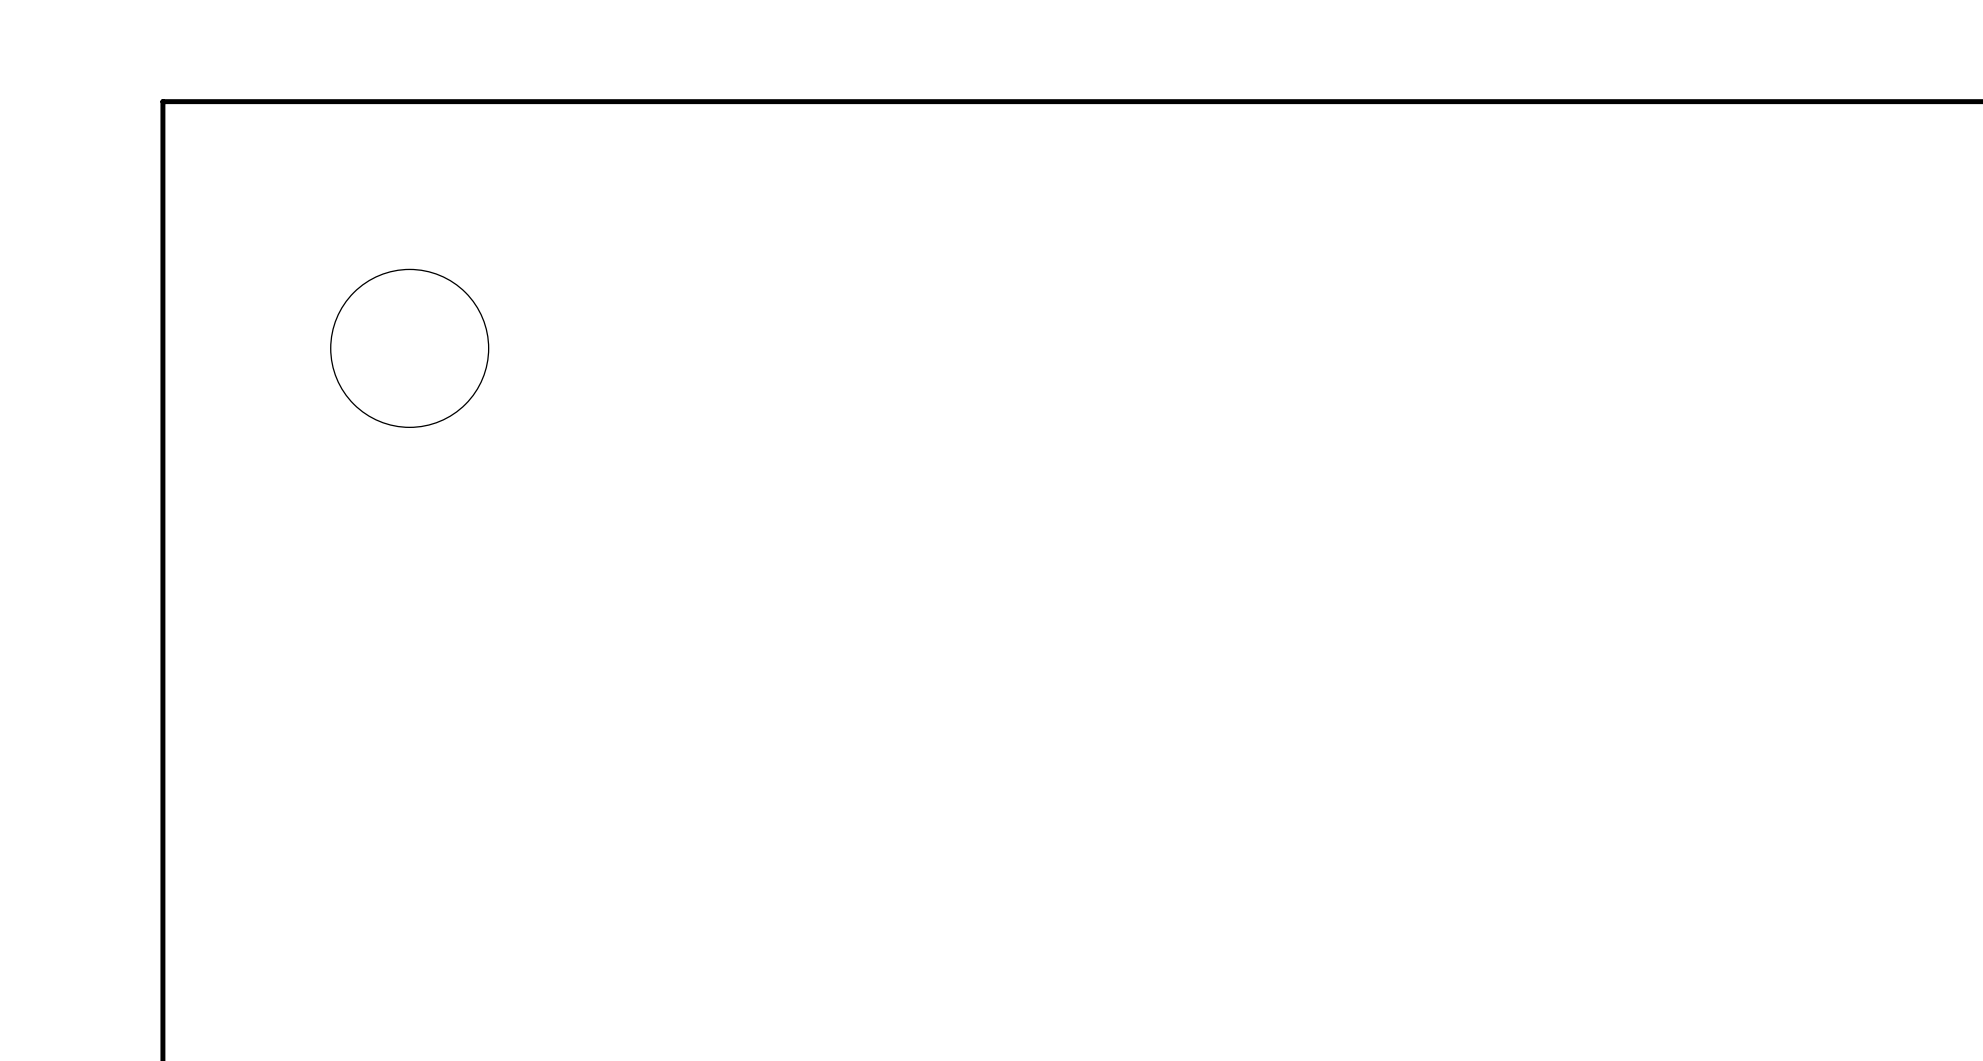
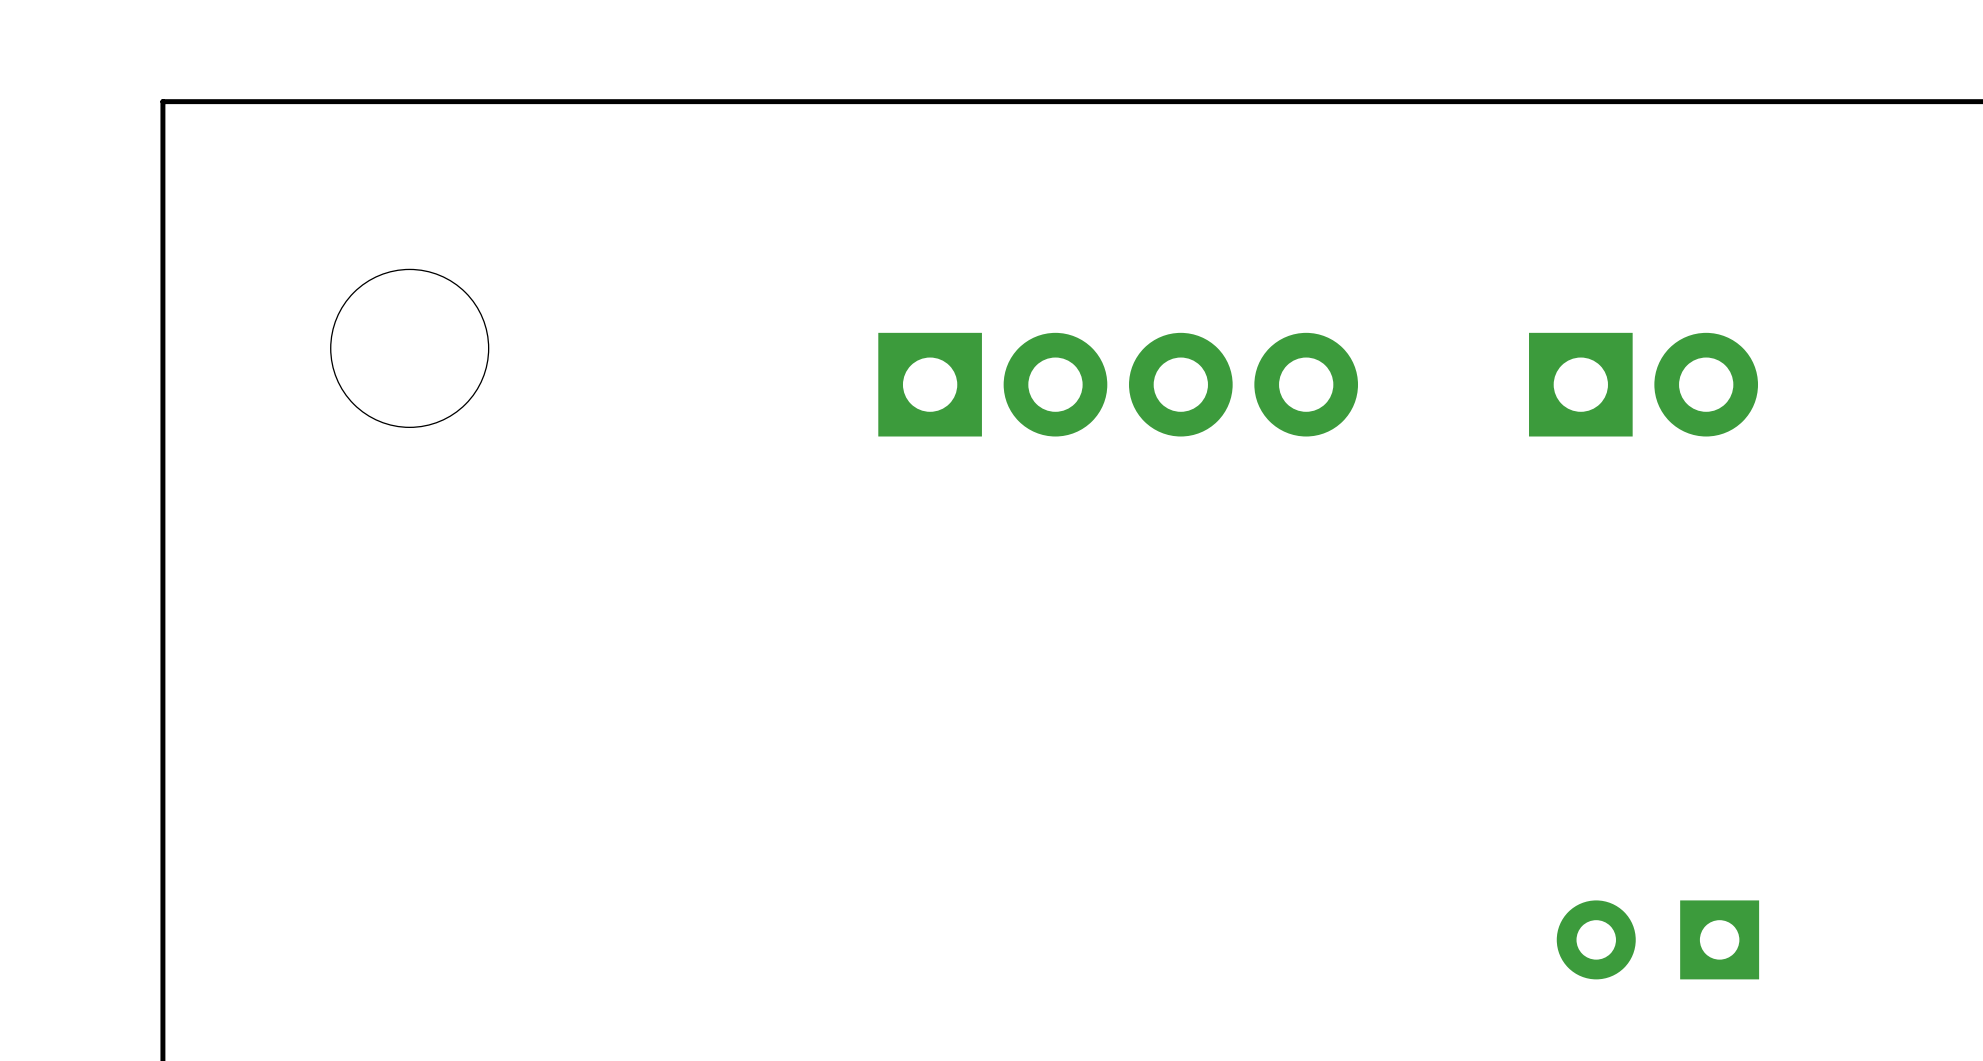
part: none -> (1118, 384)
part: none -> (1643, 384)
part: none -> (1657, 939)

